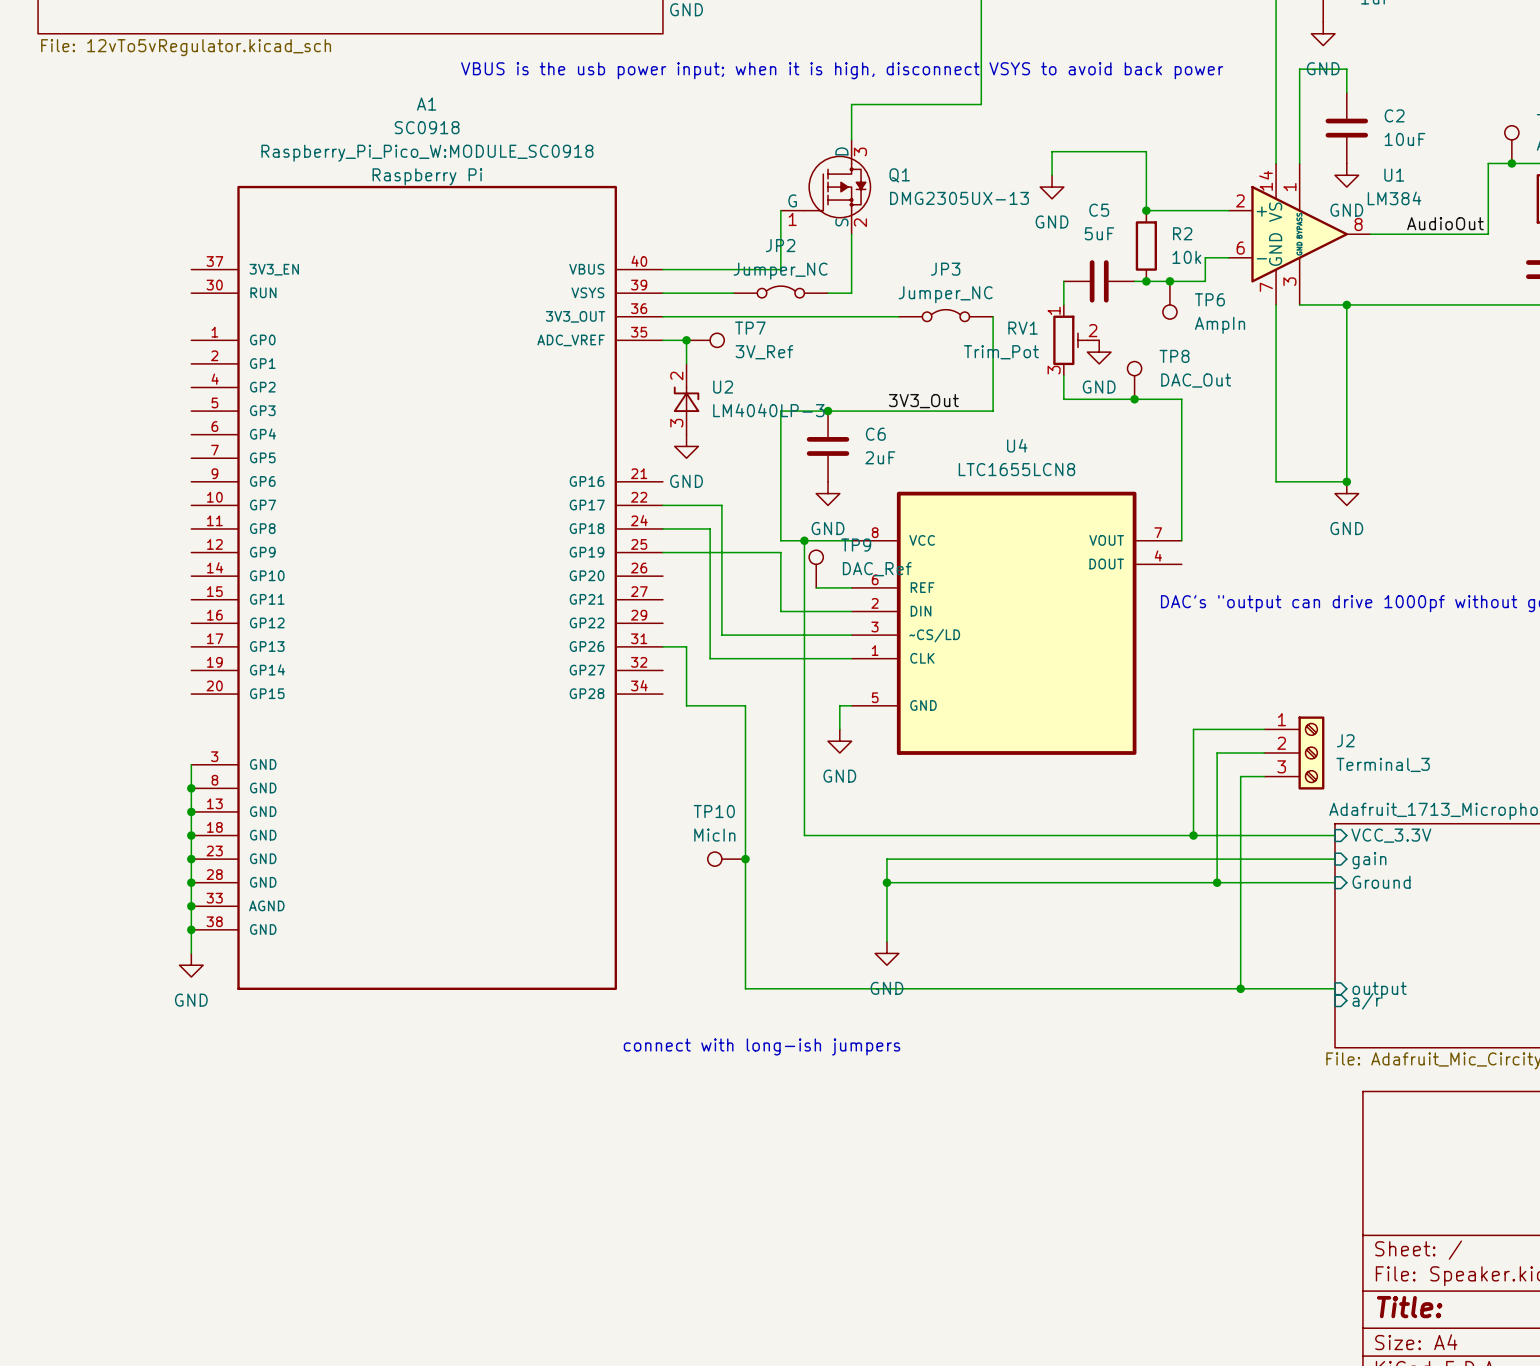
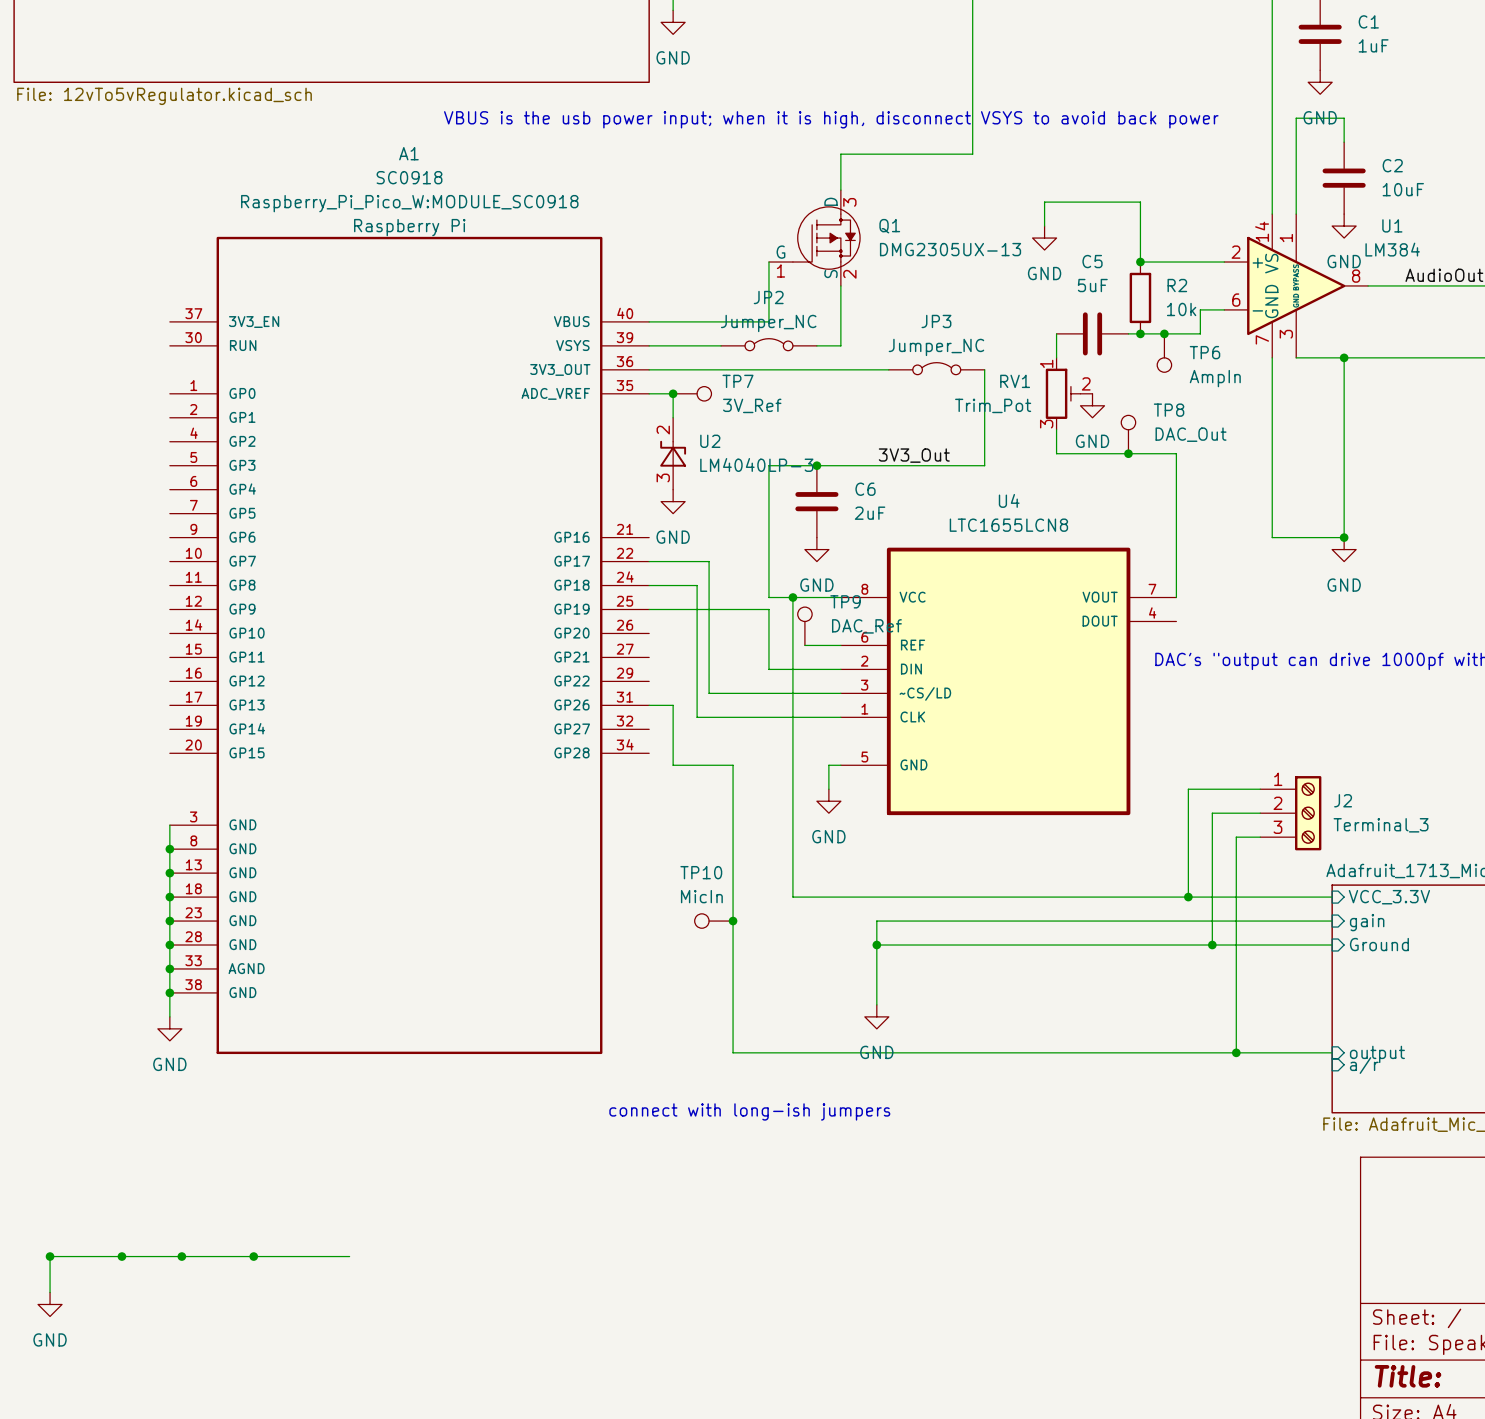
junction: none -> (50, 1256)
junction: none -> (121, 1256)
junction: none -> (181, 1256)
junction: none -> (253, 1256)
wire: none -> (349, 1256) (50, 1256) (50, 1292)
power symbol: none -> GND (50, 1304)

